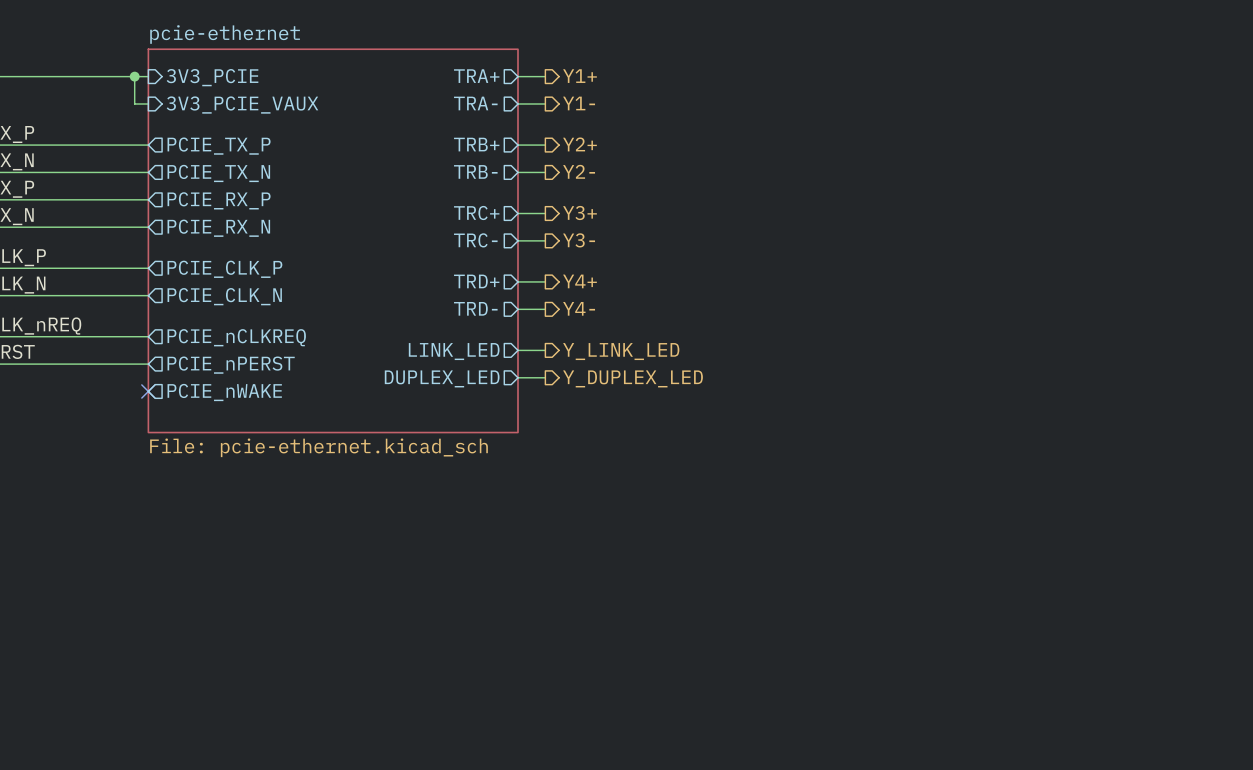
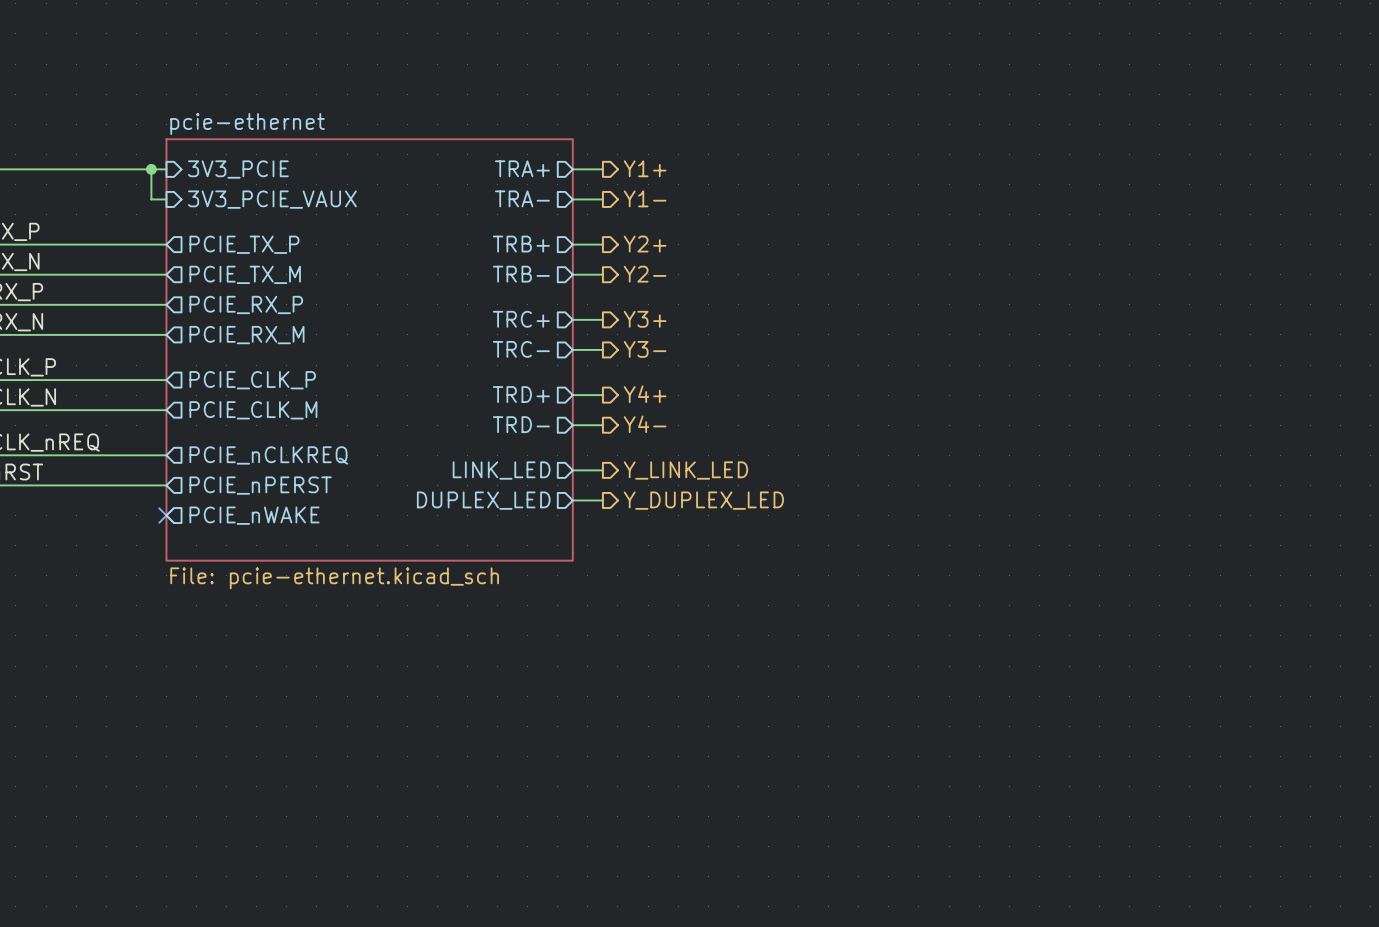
sheet pin: PCIE_TX_N (218, 173) -> PCIE_TX_M (245, 274)
sheet pin: PCIE_RX_N (218, 228) -> PCIE_RX_M (246, 335)
sheet pin: PCIE_CLK_N (224, 296) -> PCIE_CLK_M (253, 410)

